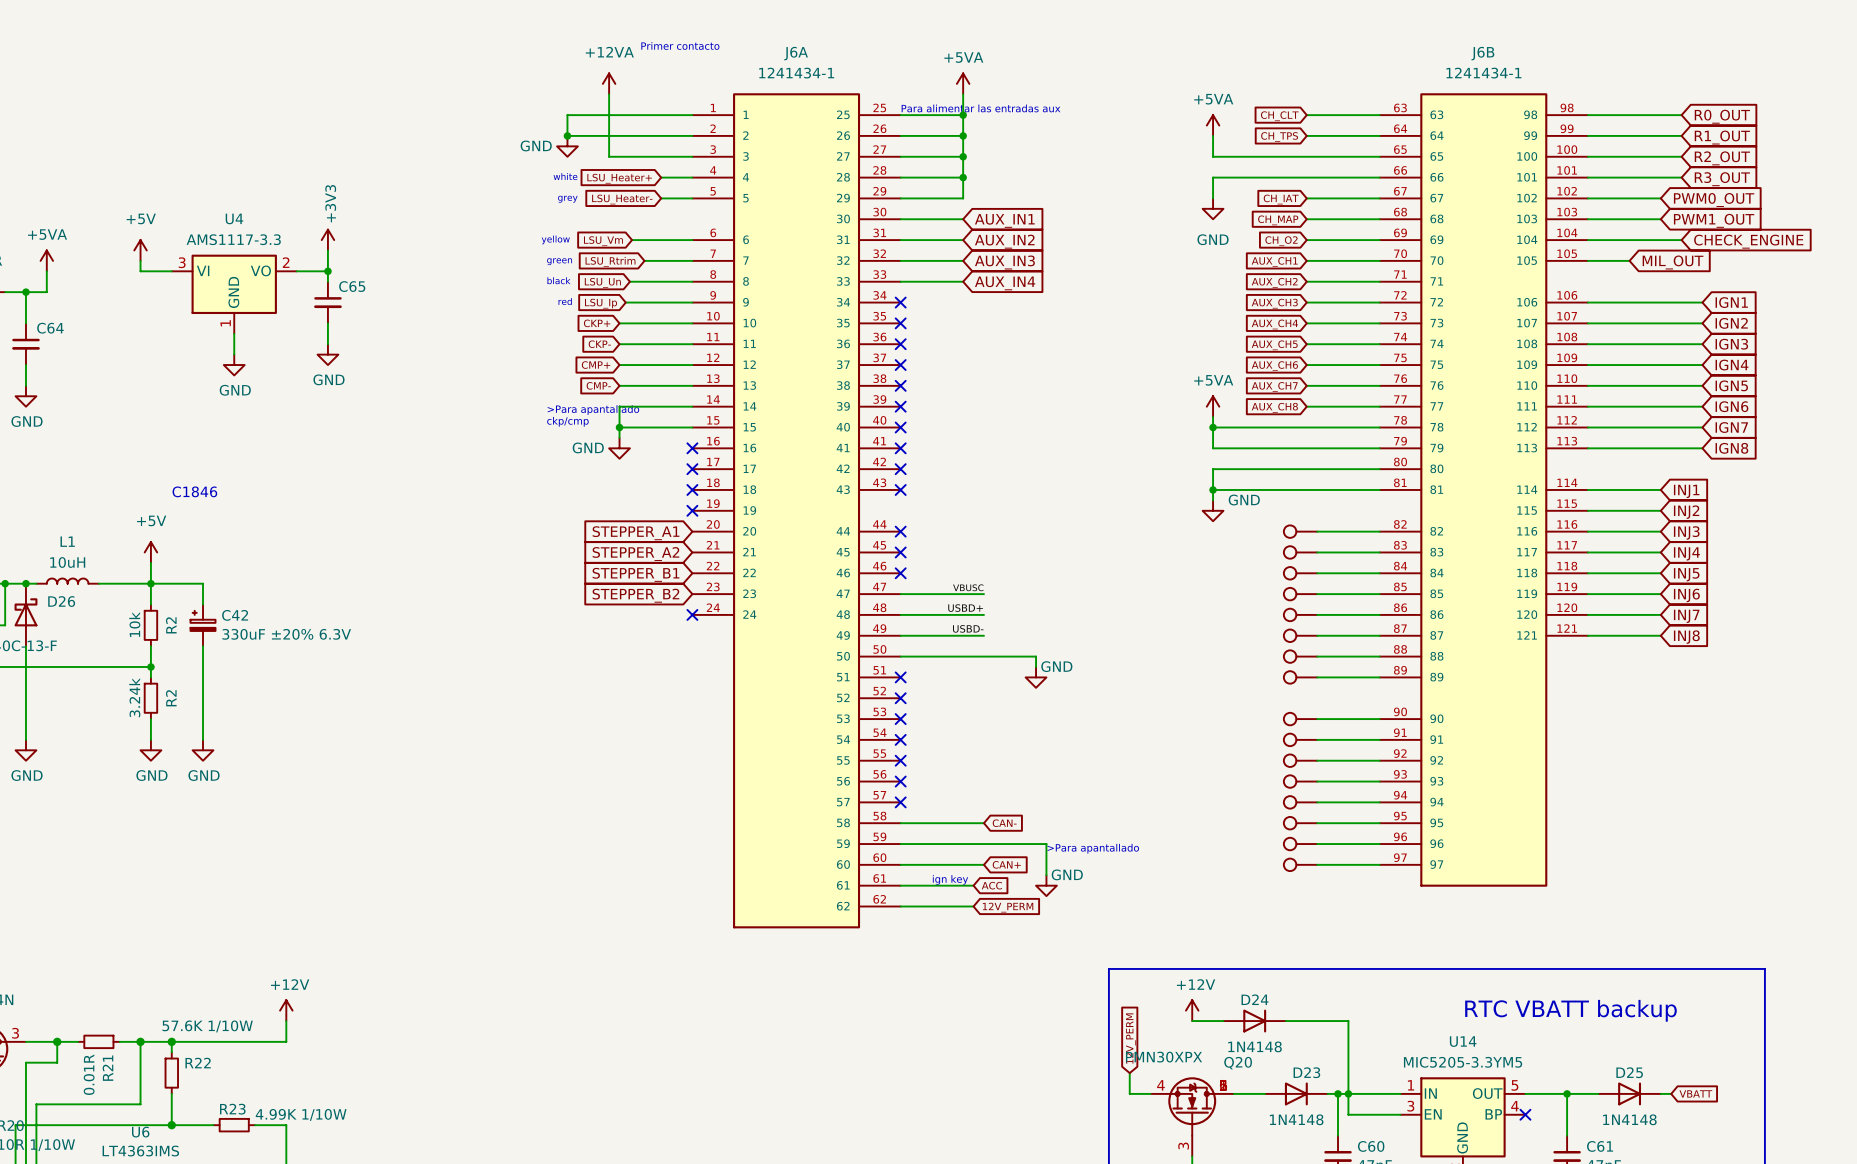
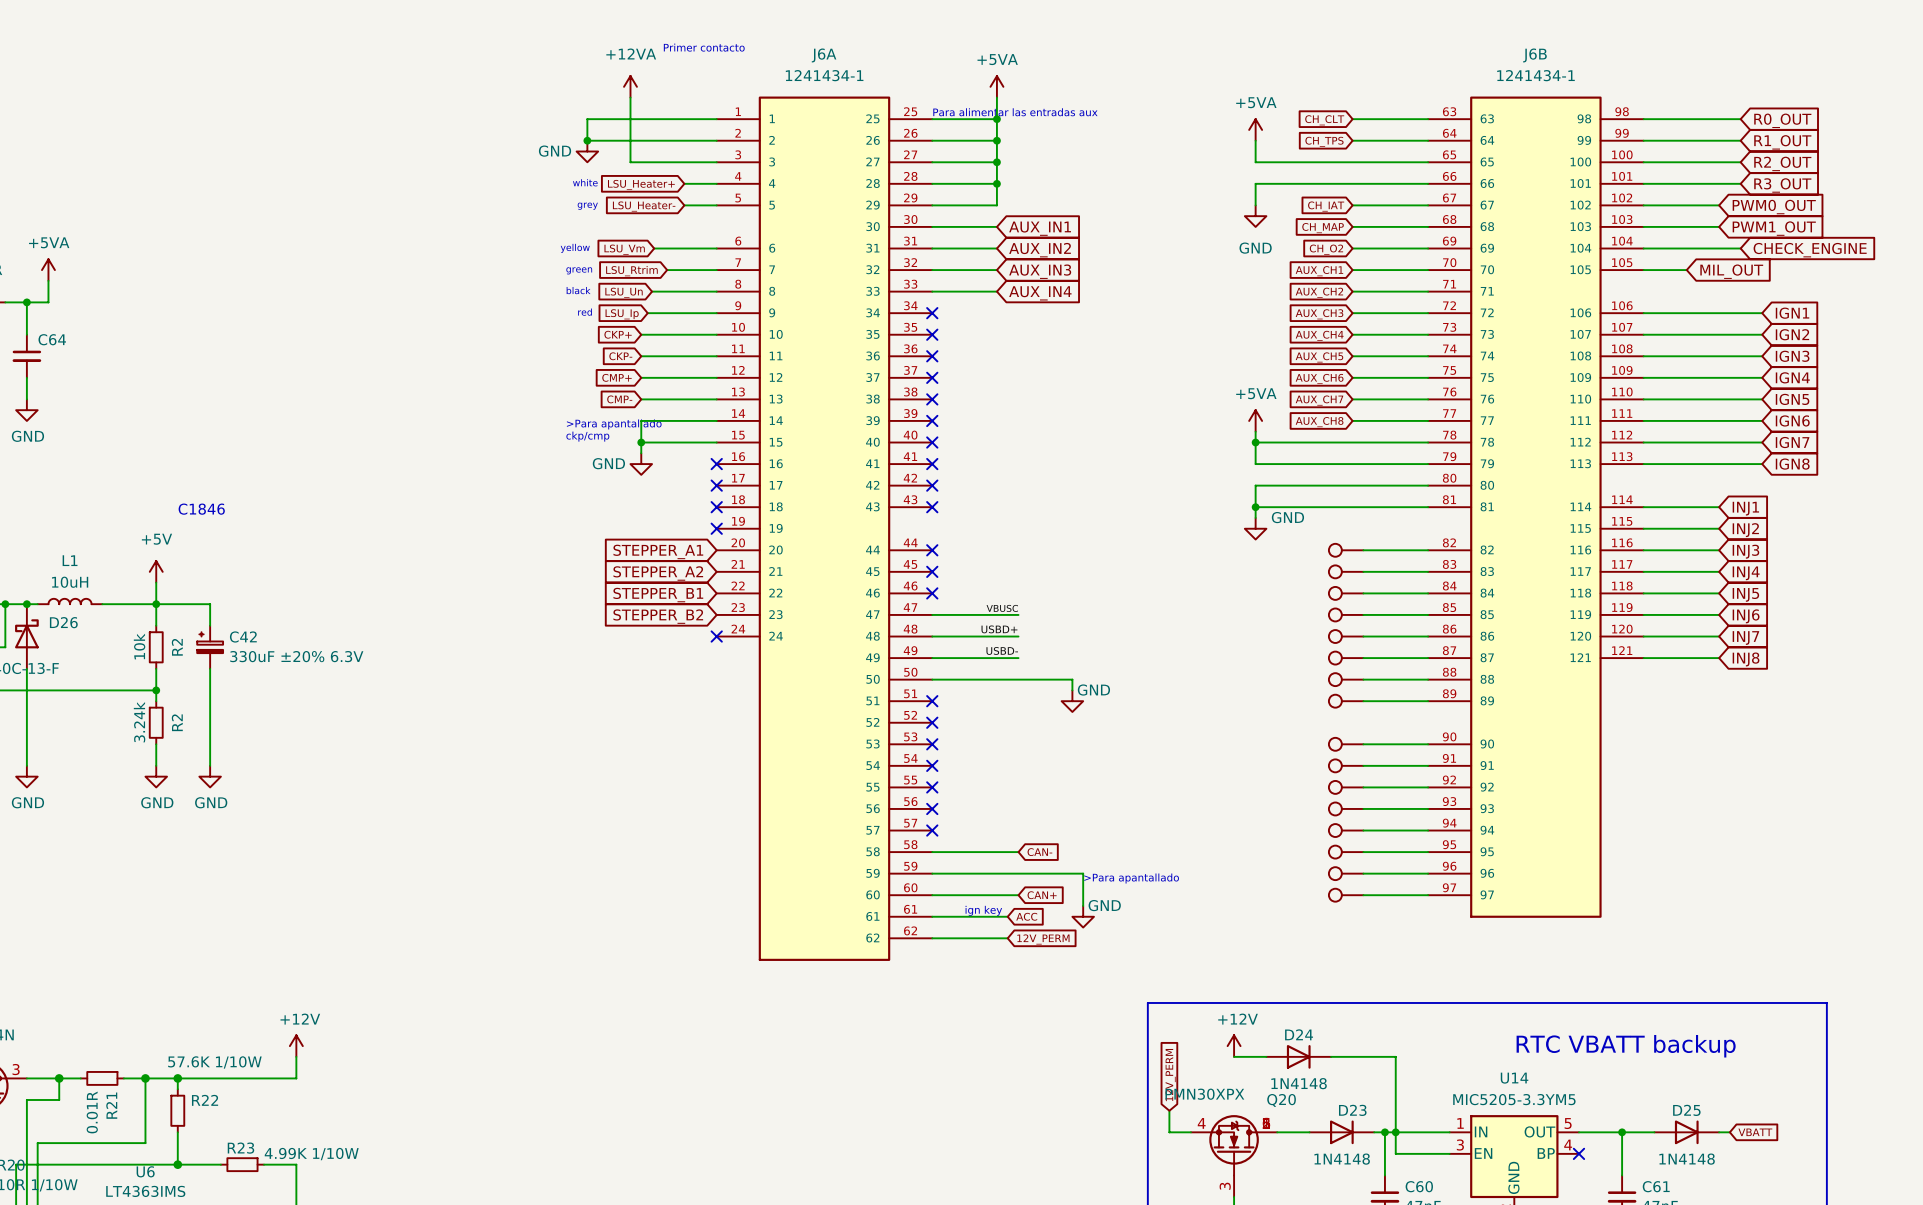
power symbol: +3V3 (327, 240) -> none
power symbol: +5V (140, 250) -> none
wire: (327, 250) (327, 281) -> none
wire: (140, 260) (140, 271) (171, 271) -> none
wire: (296, 271) (327, 271) -> none
junction: (327, 271) -> none
U4: AMS1117-3.3 (234, 294) -> none
C65: (327, 302) -> none
wire: (327, 323) (327, 344) -> none
wire: (234, 333) (234, 354) -> none
power symbol: GND (327, 354) -> none
power symbol: GND (234, 365) -> none

